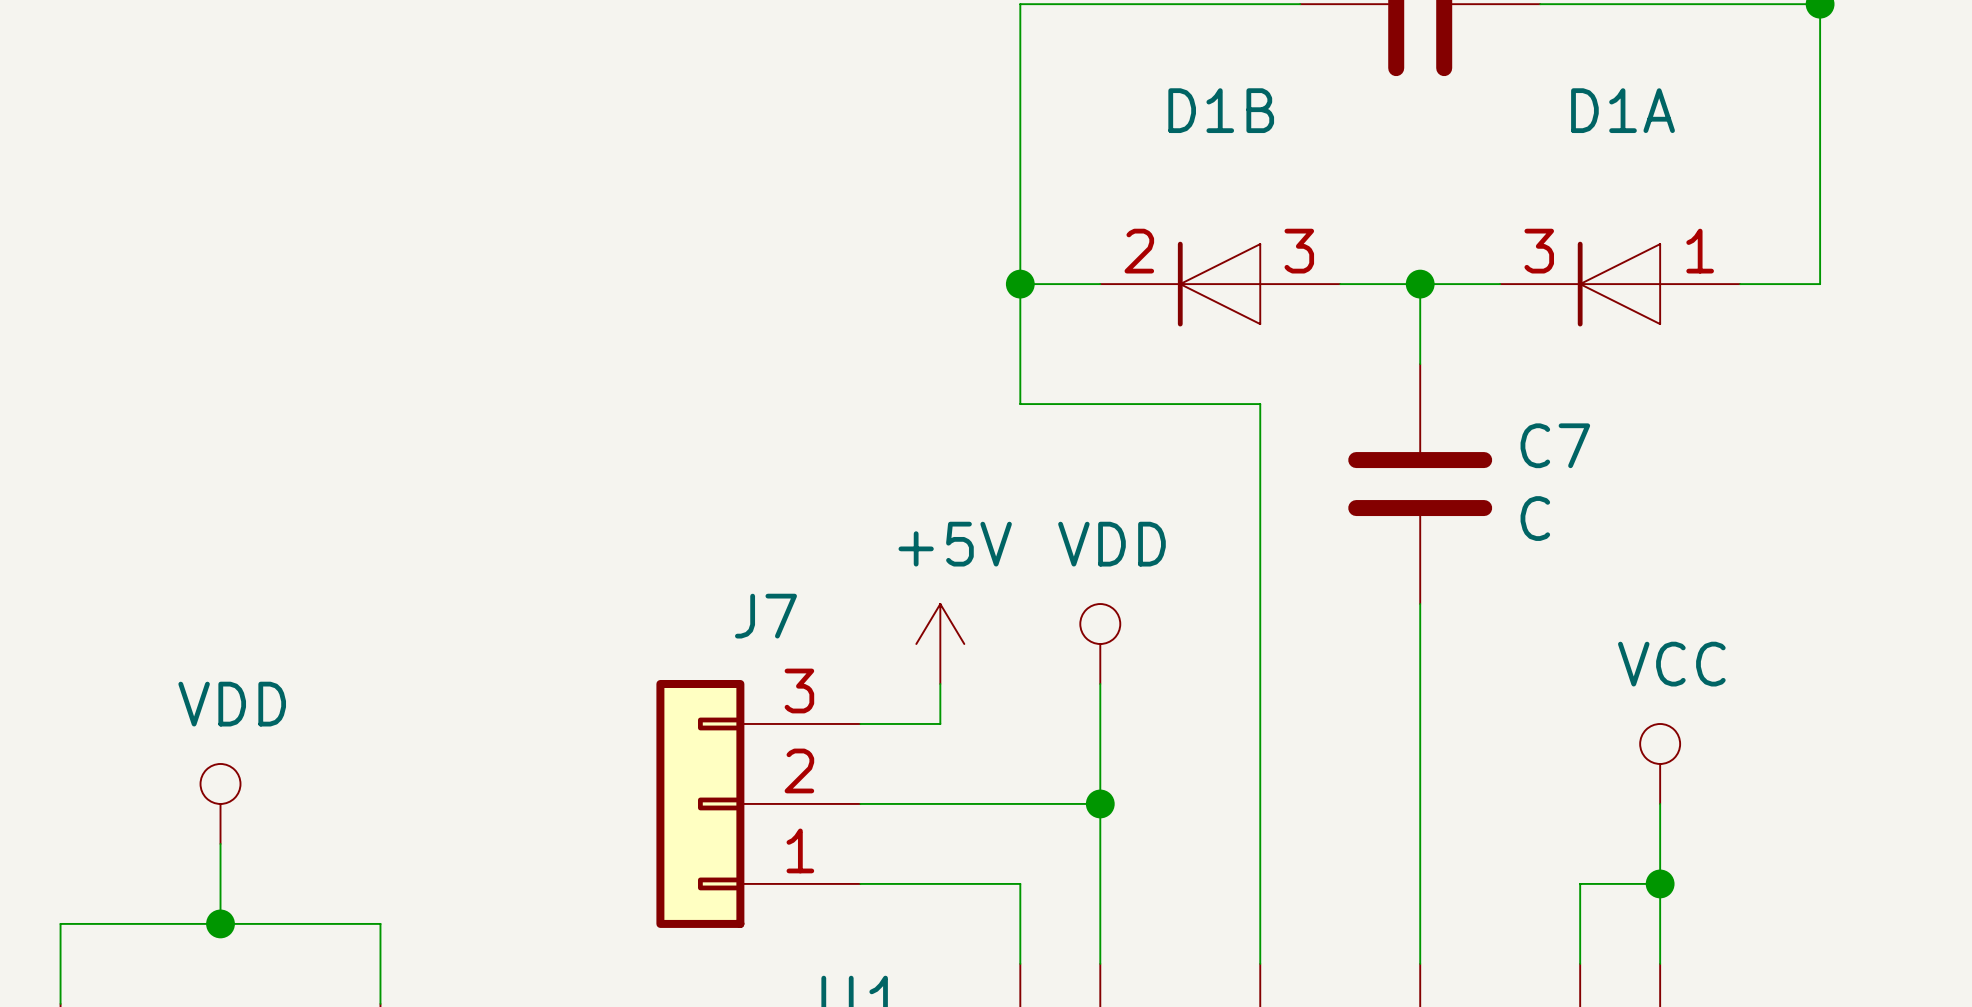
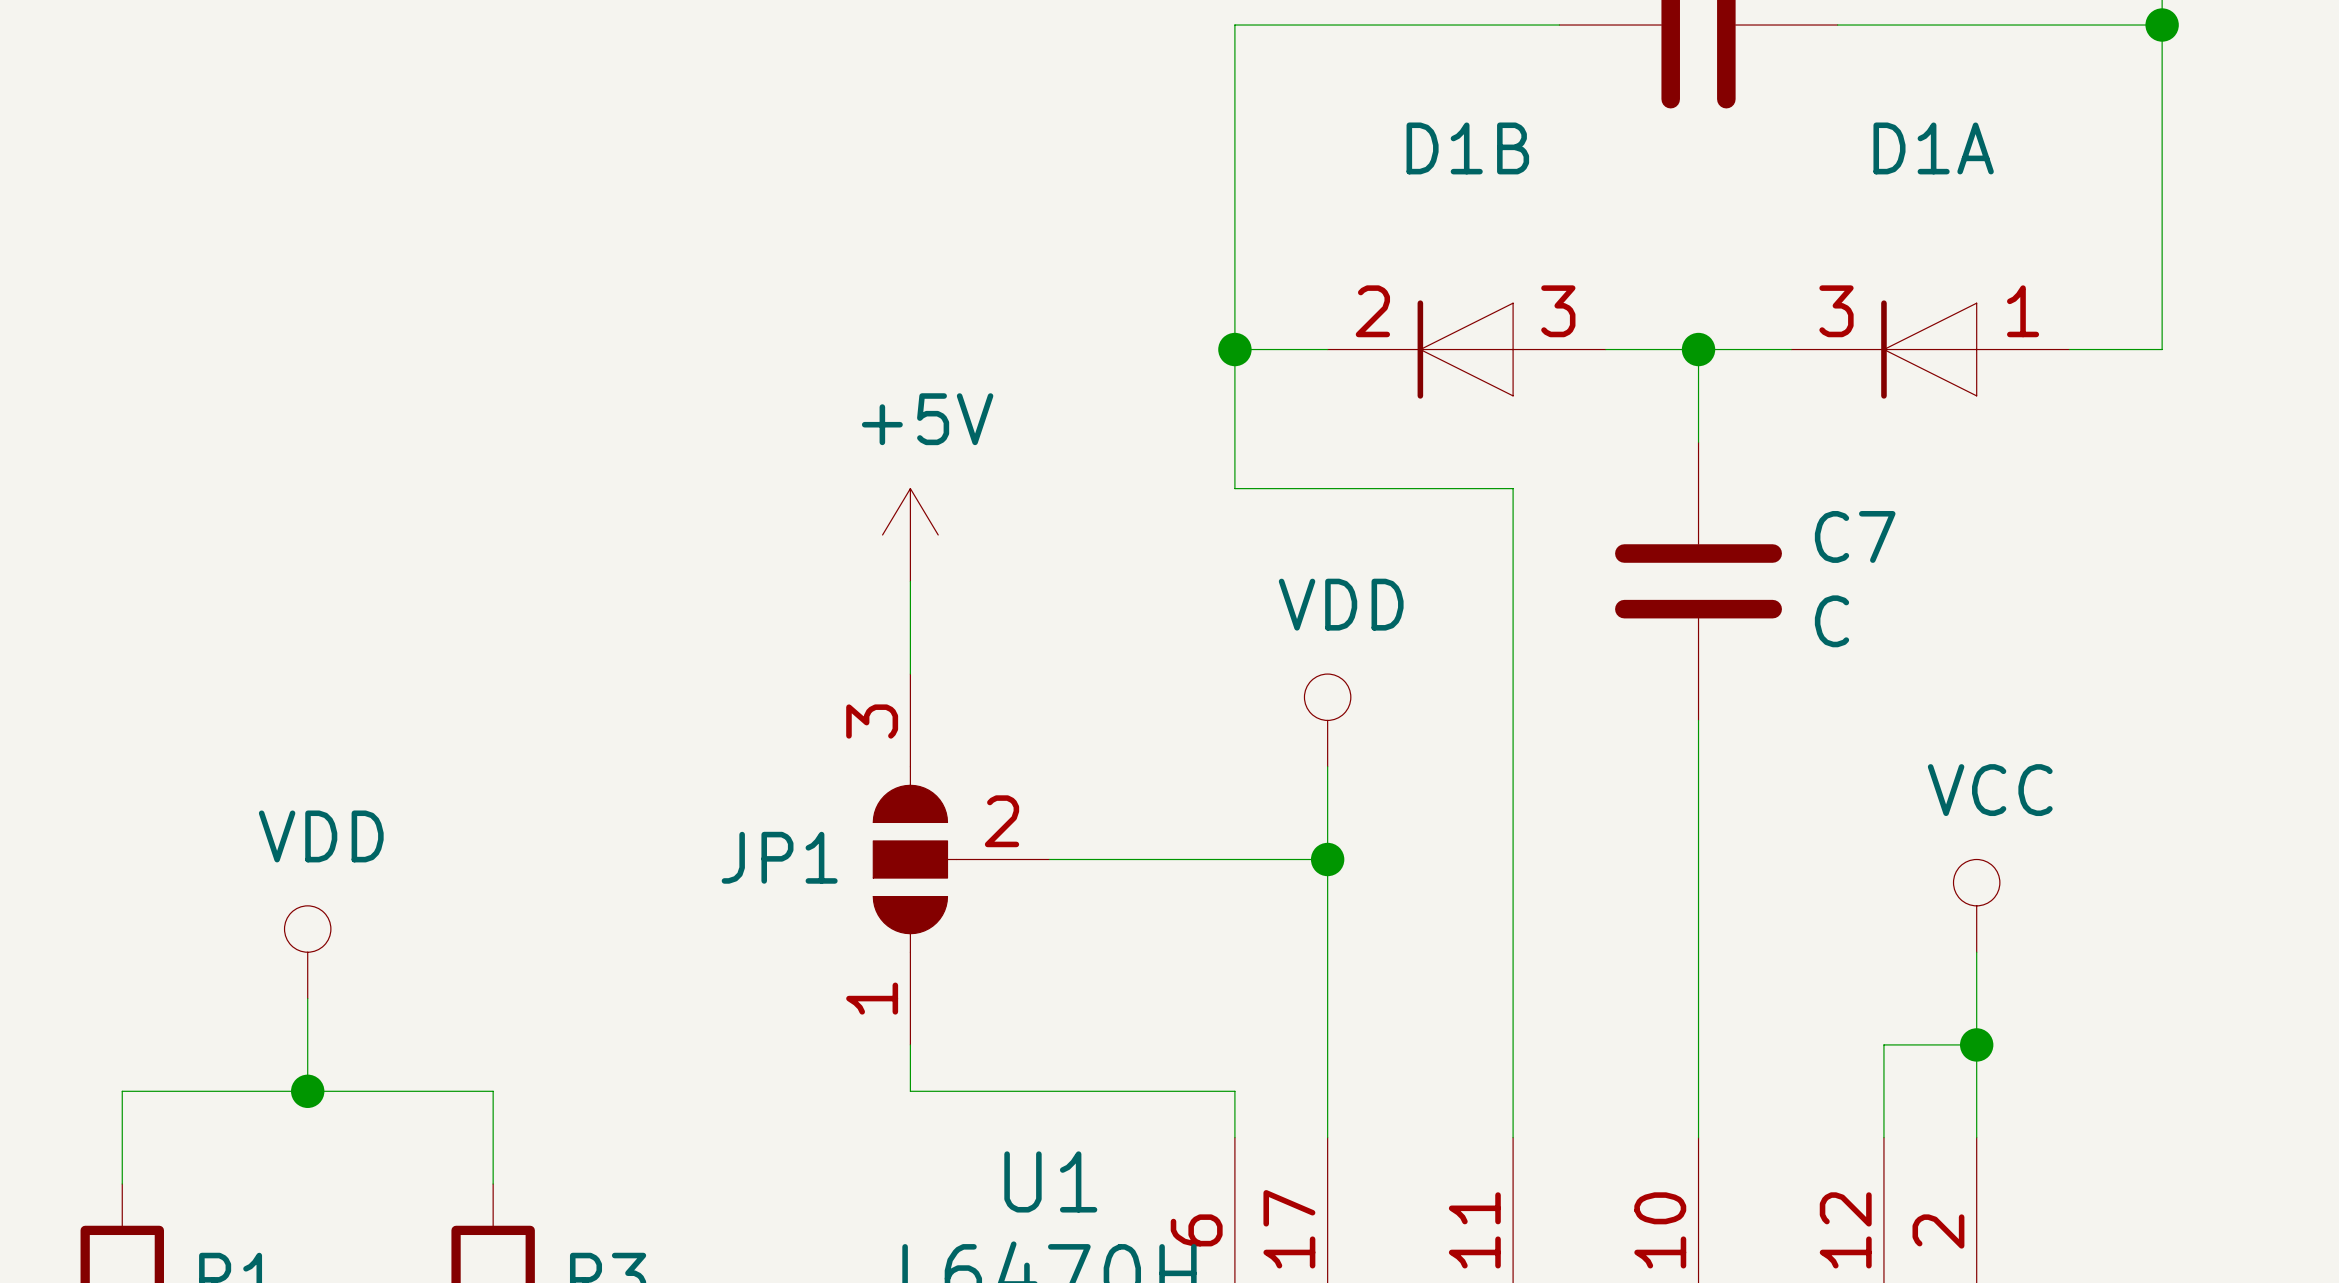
wire: none -> (910, 581) (910, 674)
power symbol position: +5V (940, 644) -> +5V (910, 534)
power symbol position: VDD (1100, 644) -> VDD (1327, 720)
wire: (940, 683) (940, 723) -> (1327, 859) (1142, 859)
JP1: none -> (961, 859)
J7: (758, 803) -> none
wire: (860, 803) (1100, 803) -> none
junction position: (1100, 803) -> (1327, 859)
wire: (860, 883) (1020, 883) (1020, 923) -> (910, 1044) (910, 1091) (1234, 1091)

